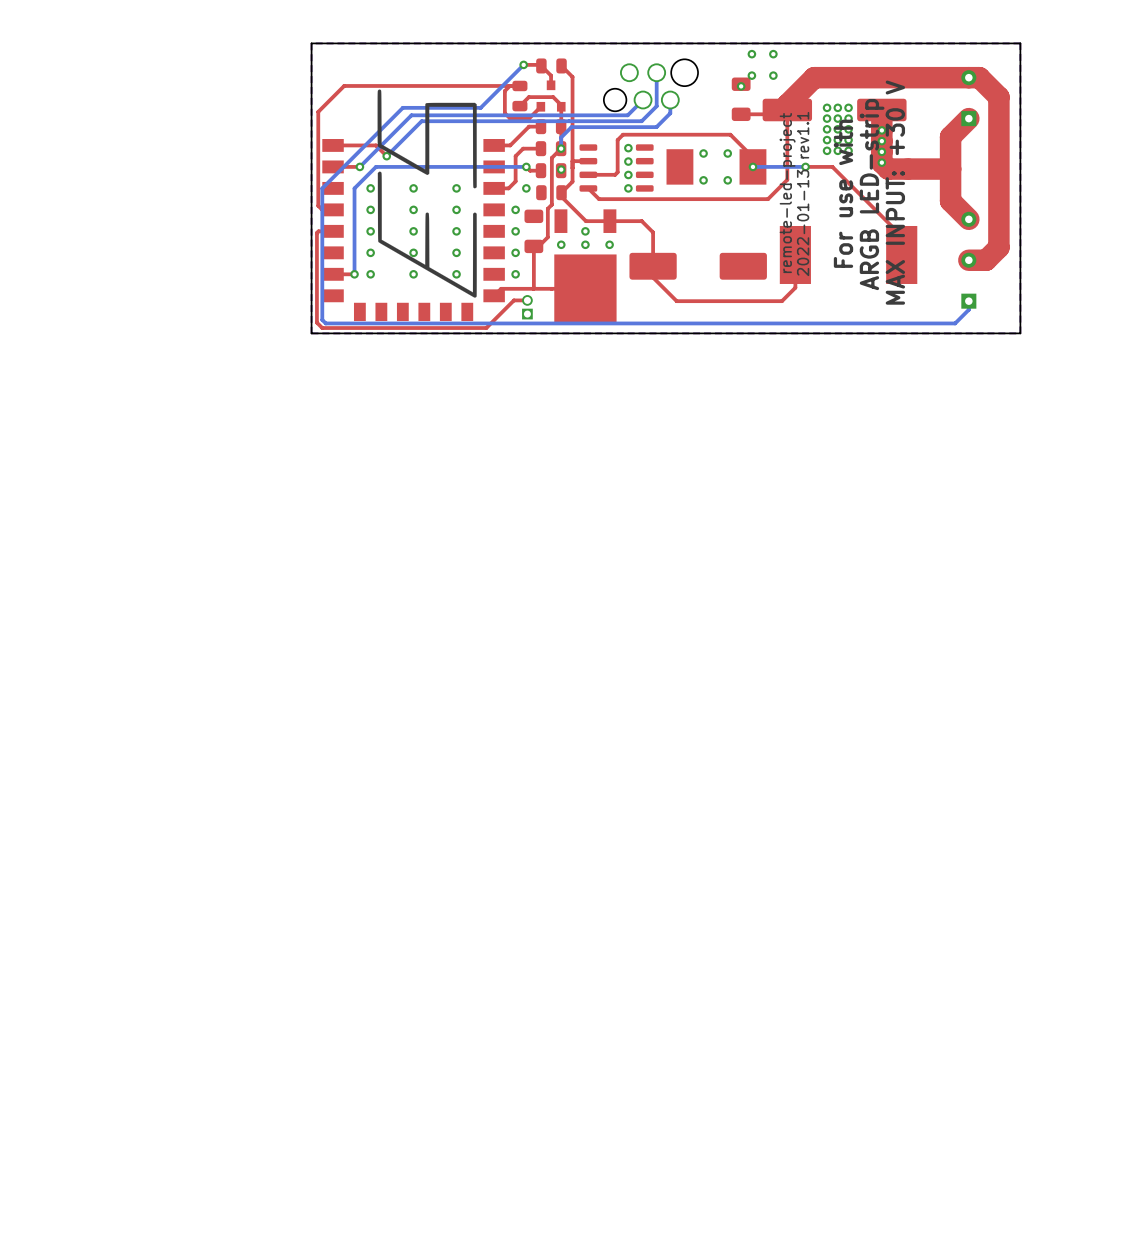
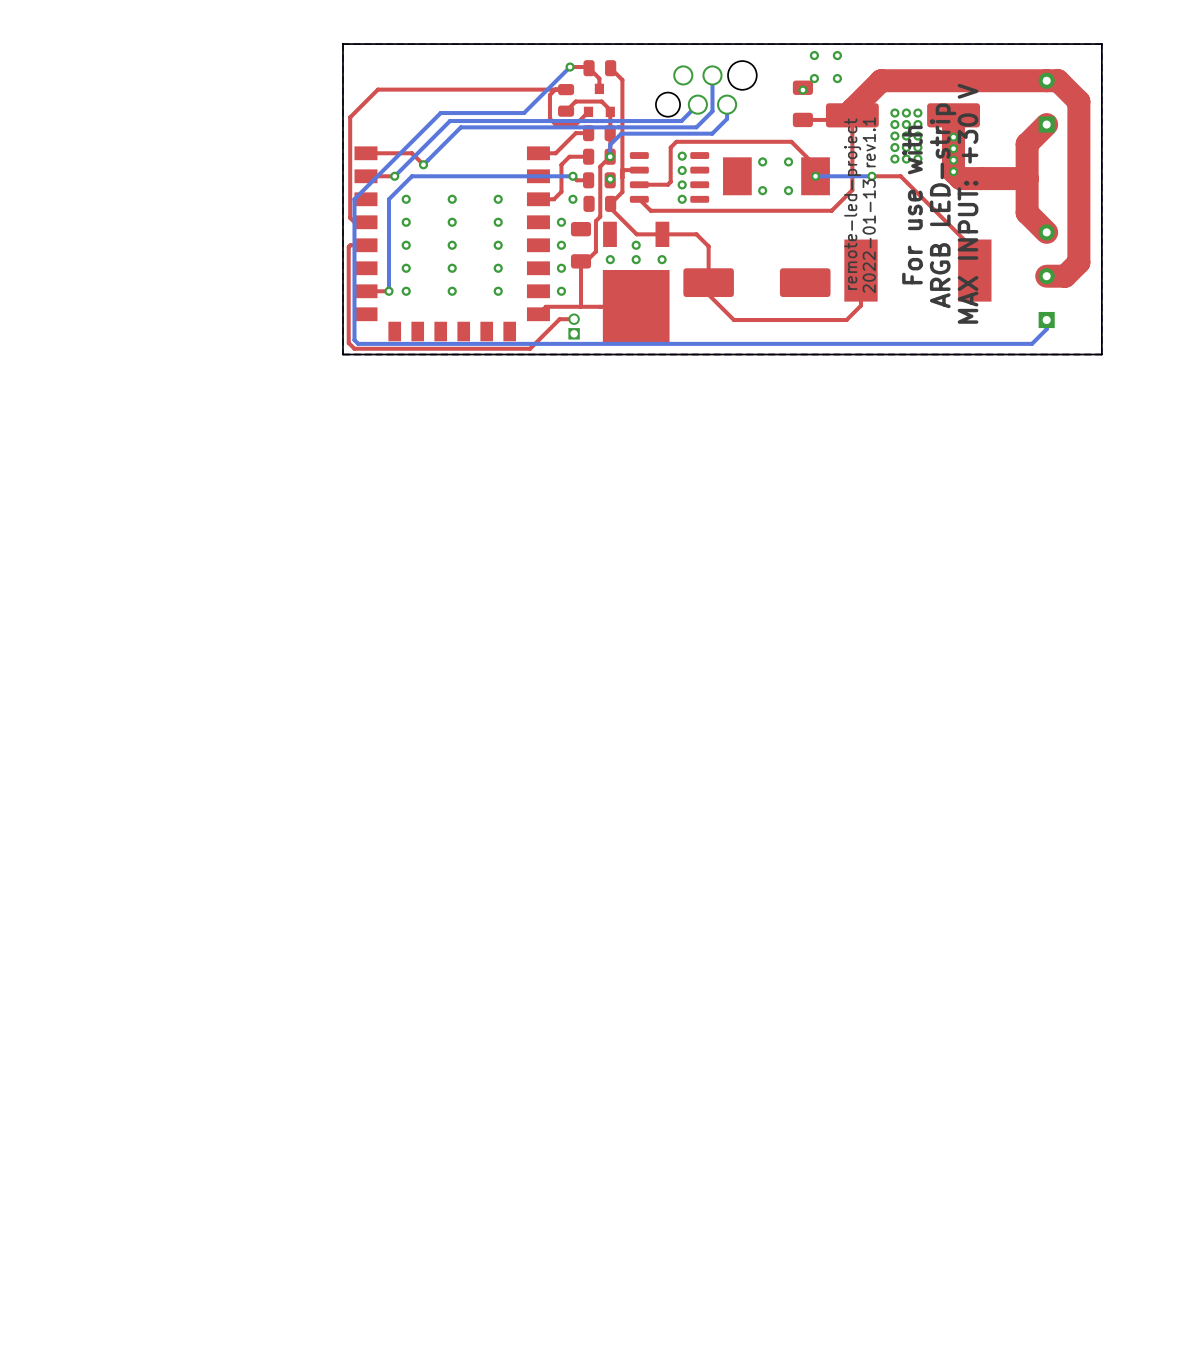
drawing: [377, 89, 477, 298] -> none

